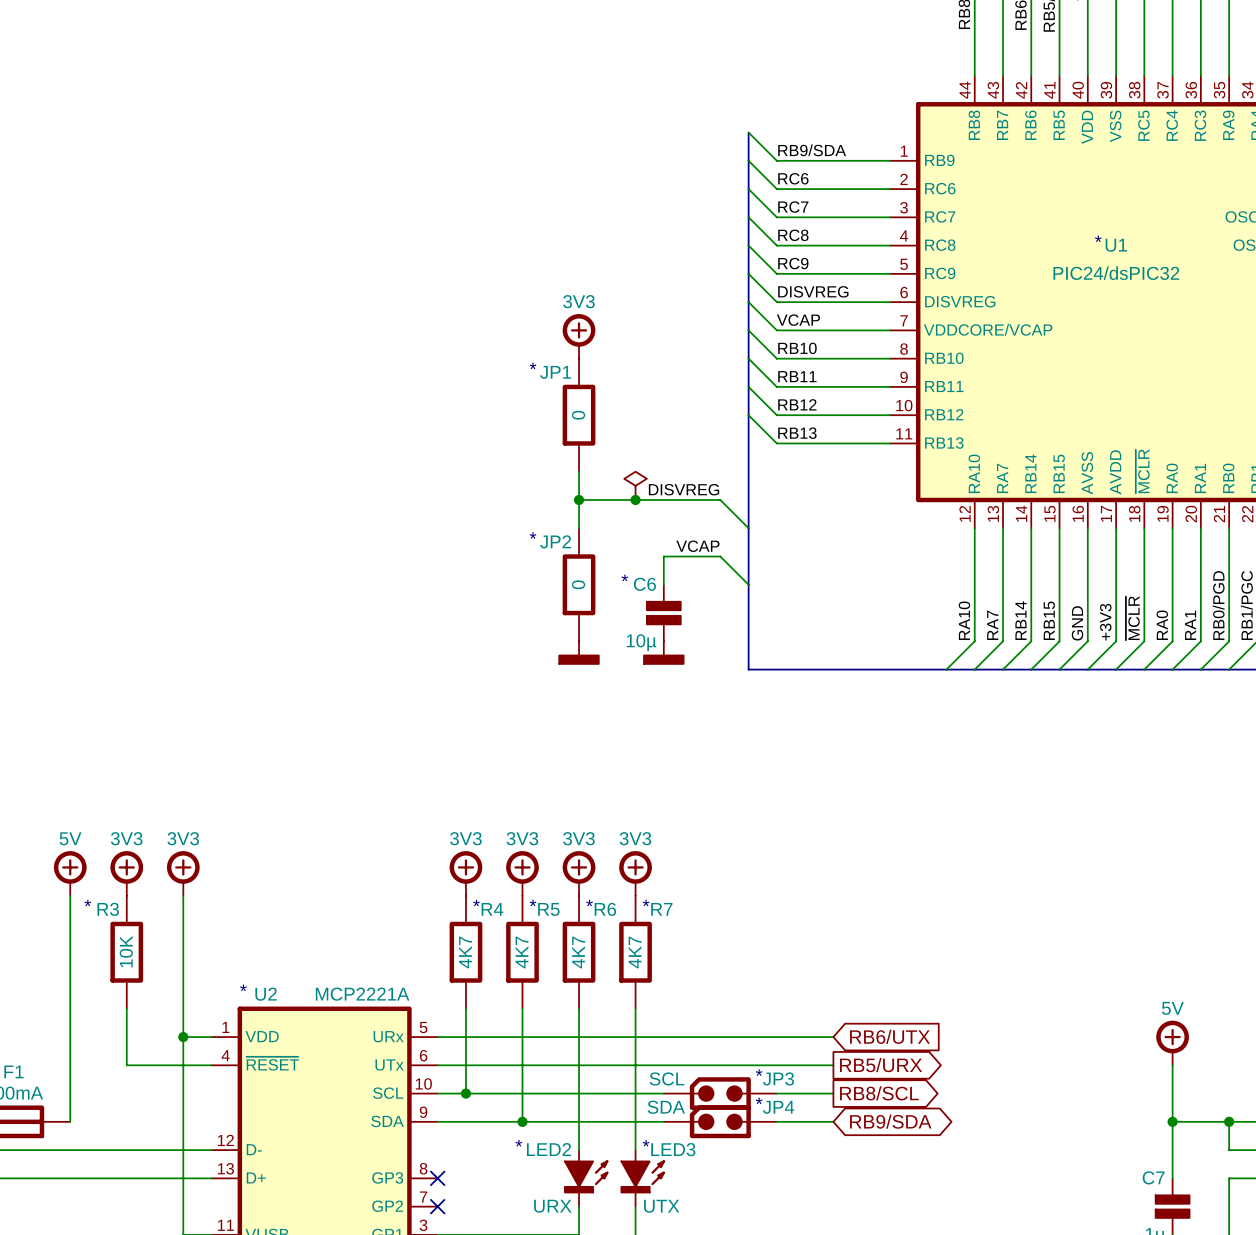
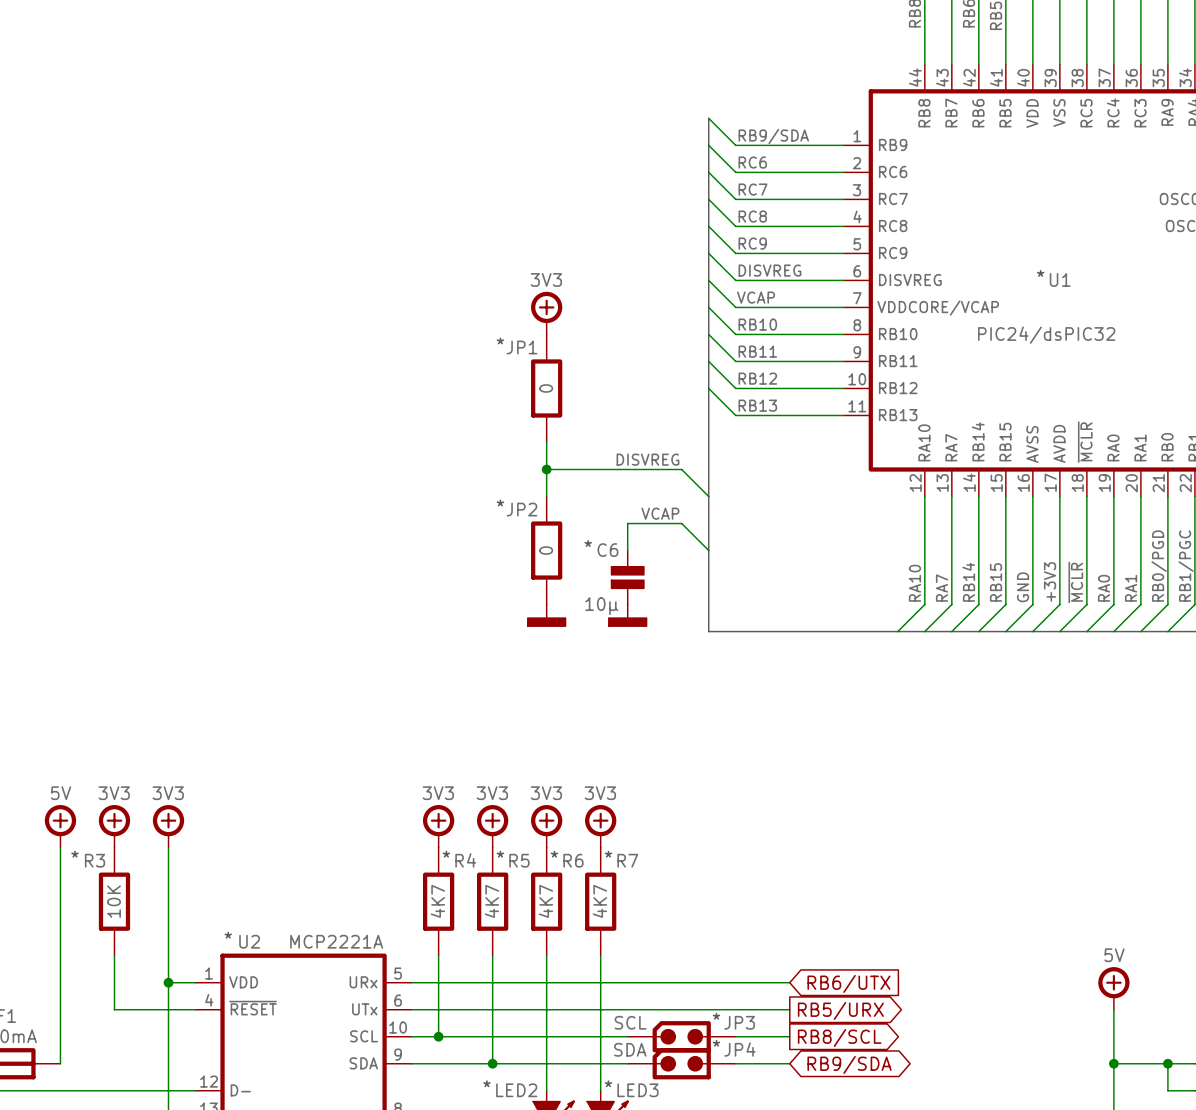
text position: * (1098, 238) -> * (1040, 273)
U1 name position: U1 (1116, 245) -> U1 (1060, 279)
U1 value position: PIC24/dsPIC32 (1116, 273) -> PIC24/dsPIC32 (1046, 335)
power symbol: (635, 485) -> none
junction: (635, 499) -> none

